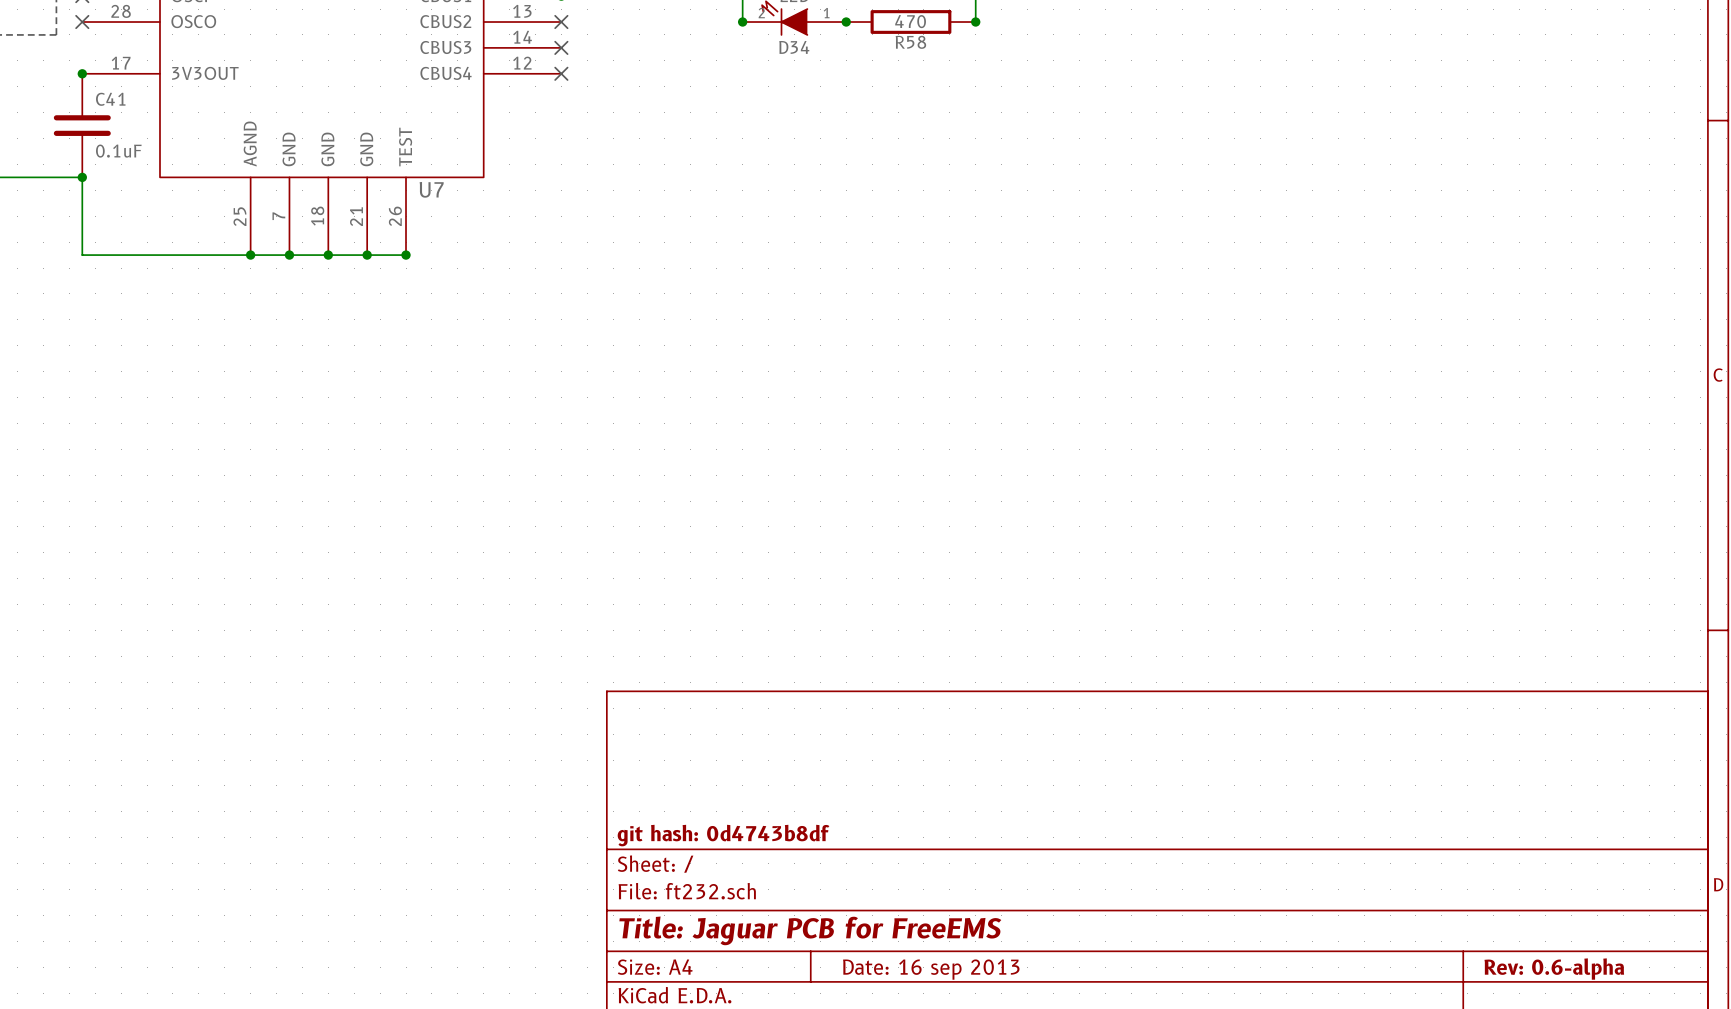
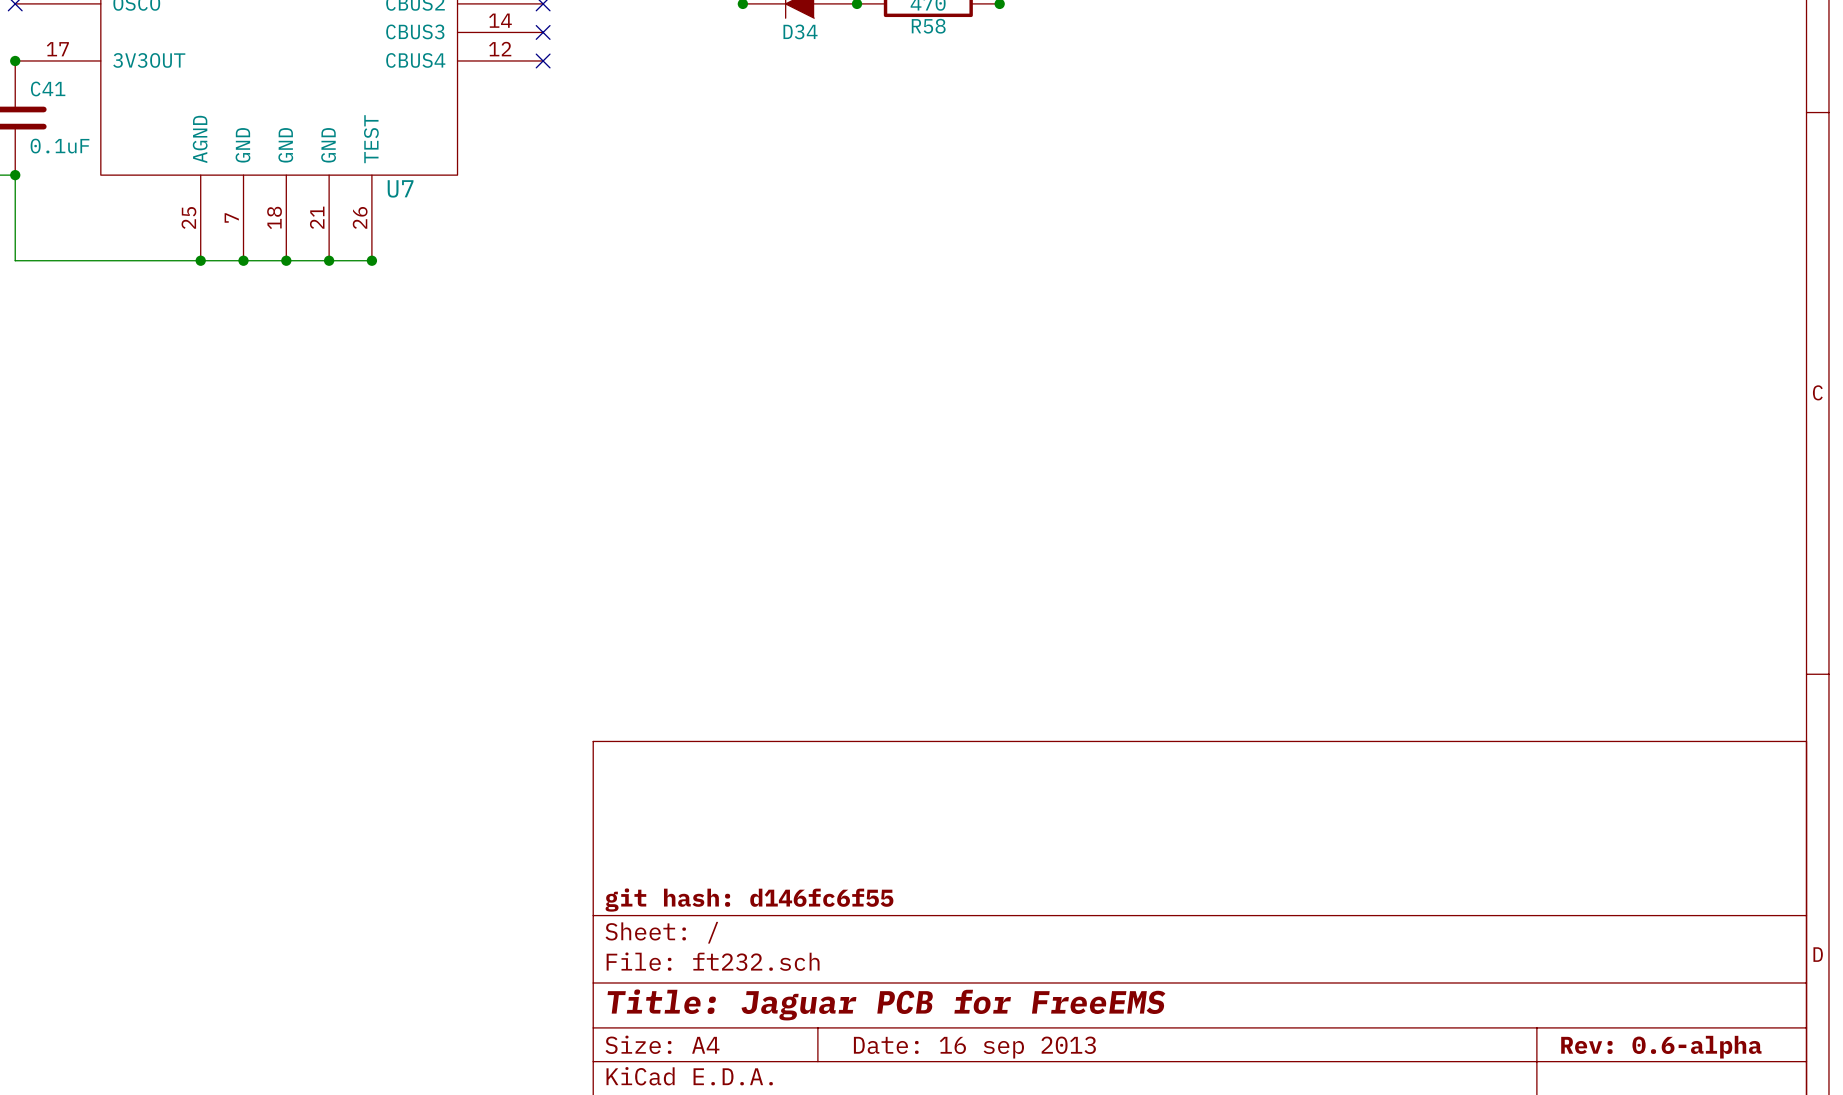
title block: git hash: 0d4743b8df (723, 835) -> git hash: d146fc6f55 (749, 900)

